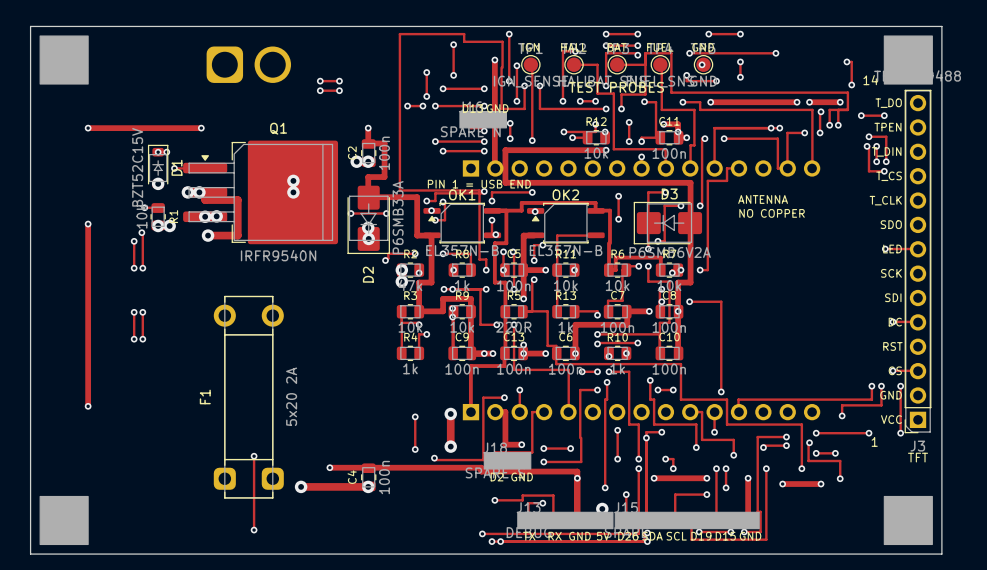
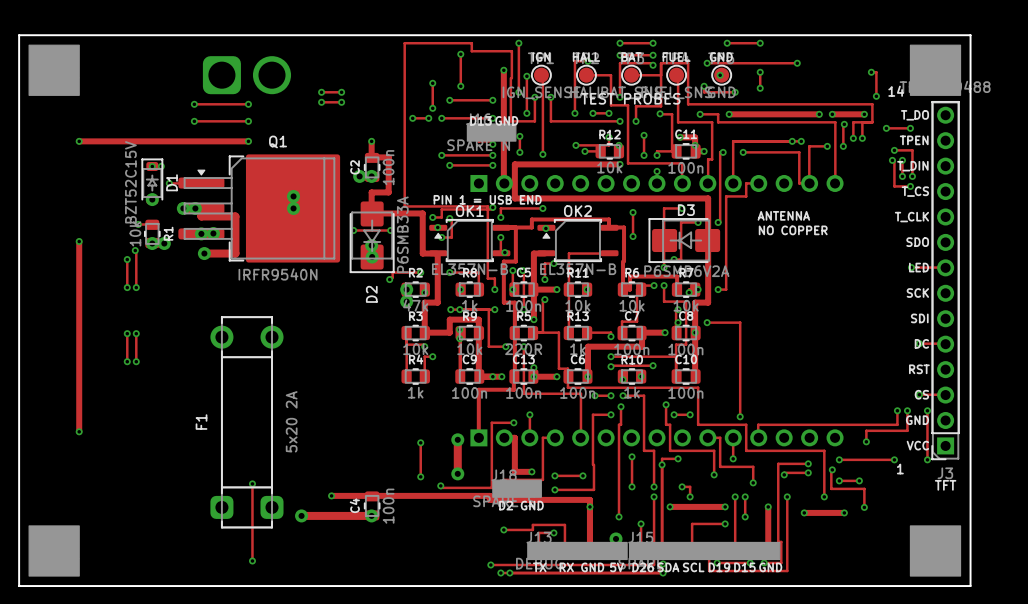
track: none -> (194, 104) (248, 104)
via: none -> (194, 104)
via: none -> (248, 104)
track: none -> (194, 121) (248, 121)
via: none -> (194, 121)
via: none -> (248, 121)
track: none -> (197, 141) (248, 141)
via: (201, 128) -> none
via: none -> (248, 141)

